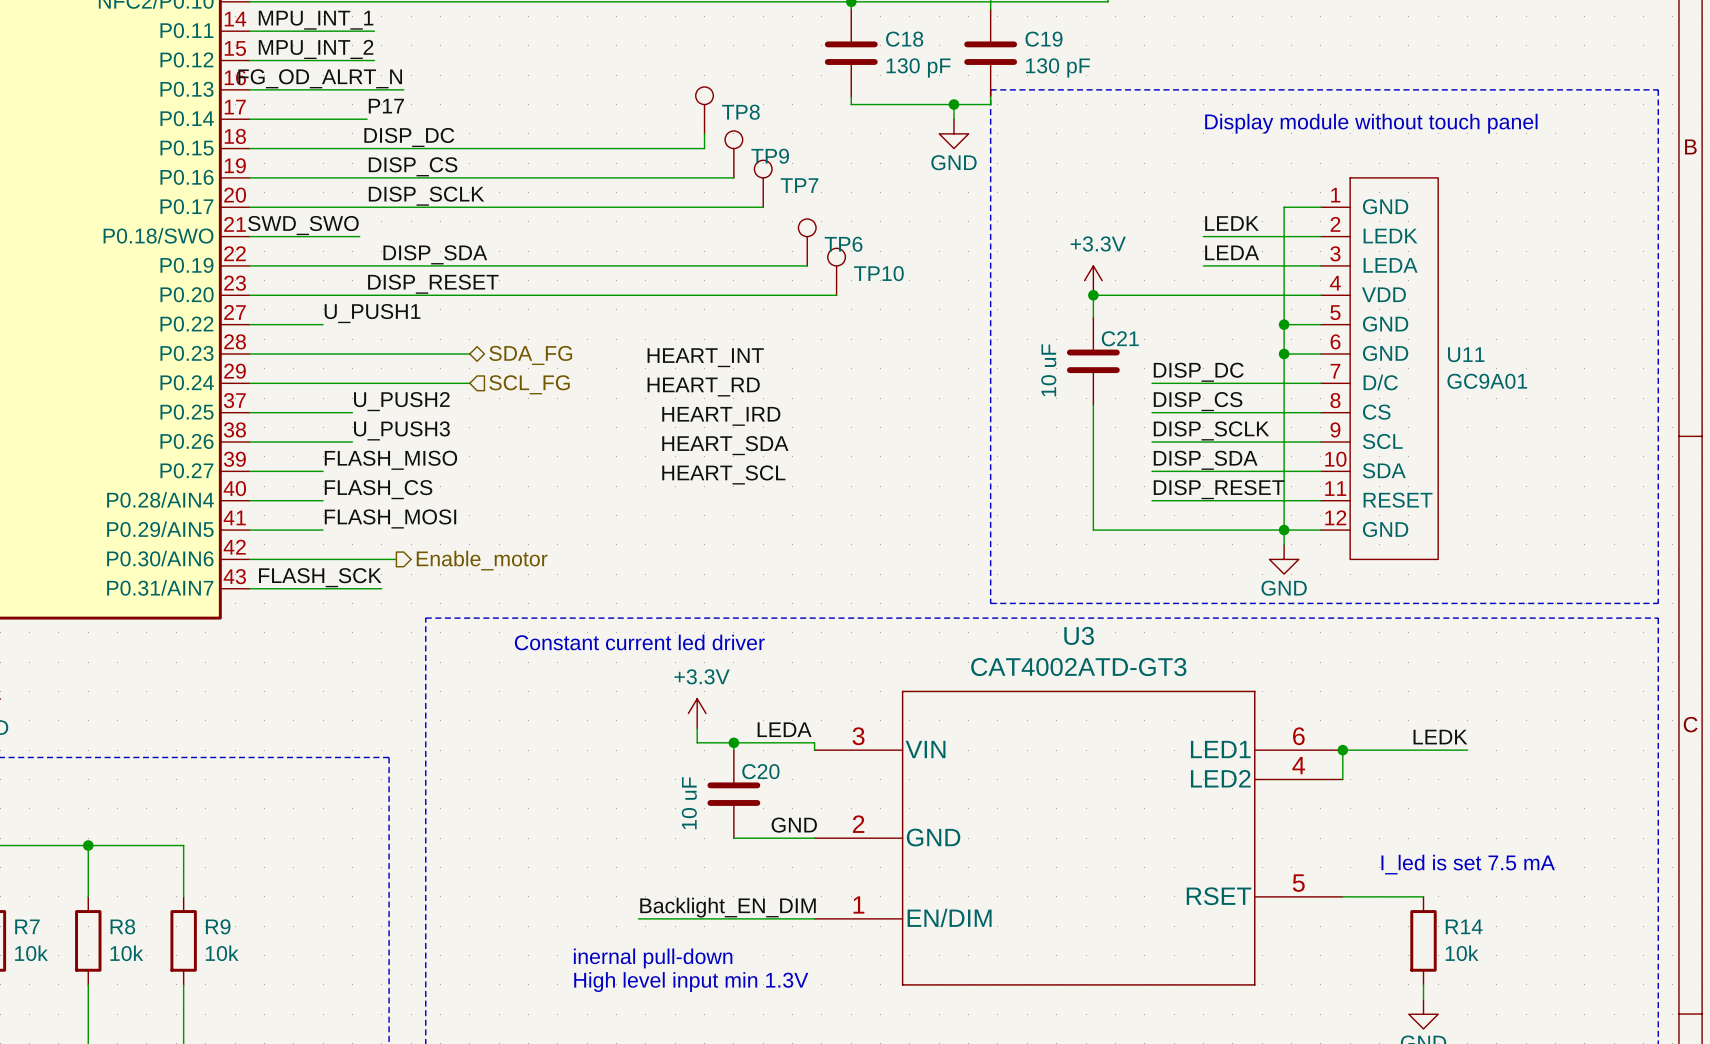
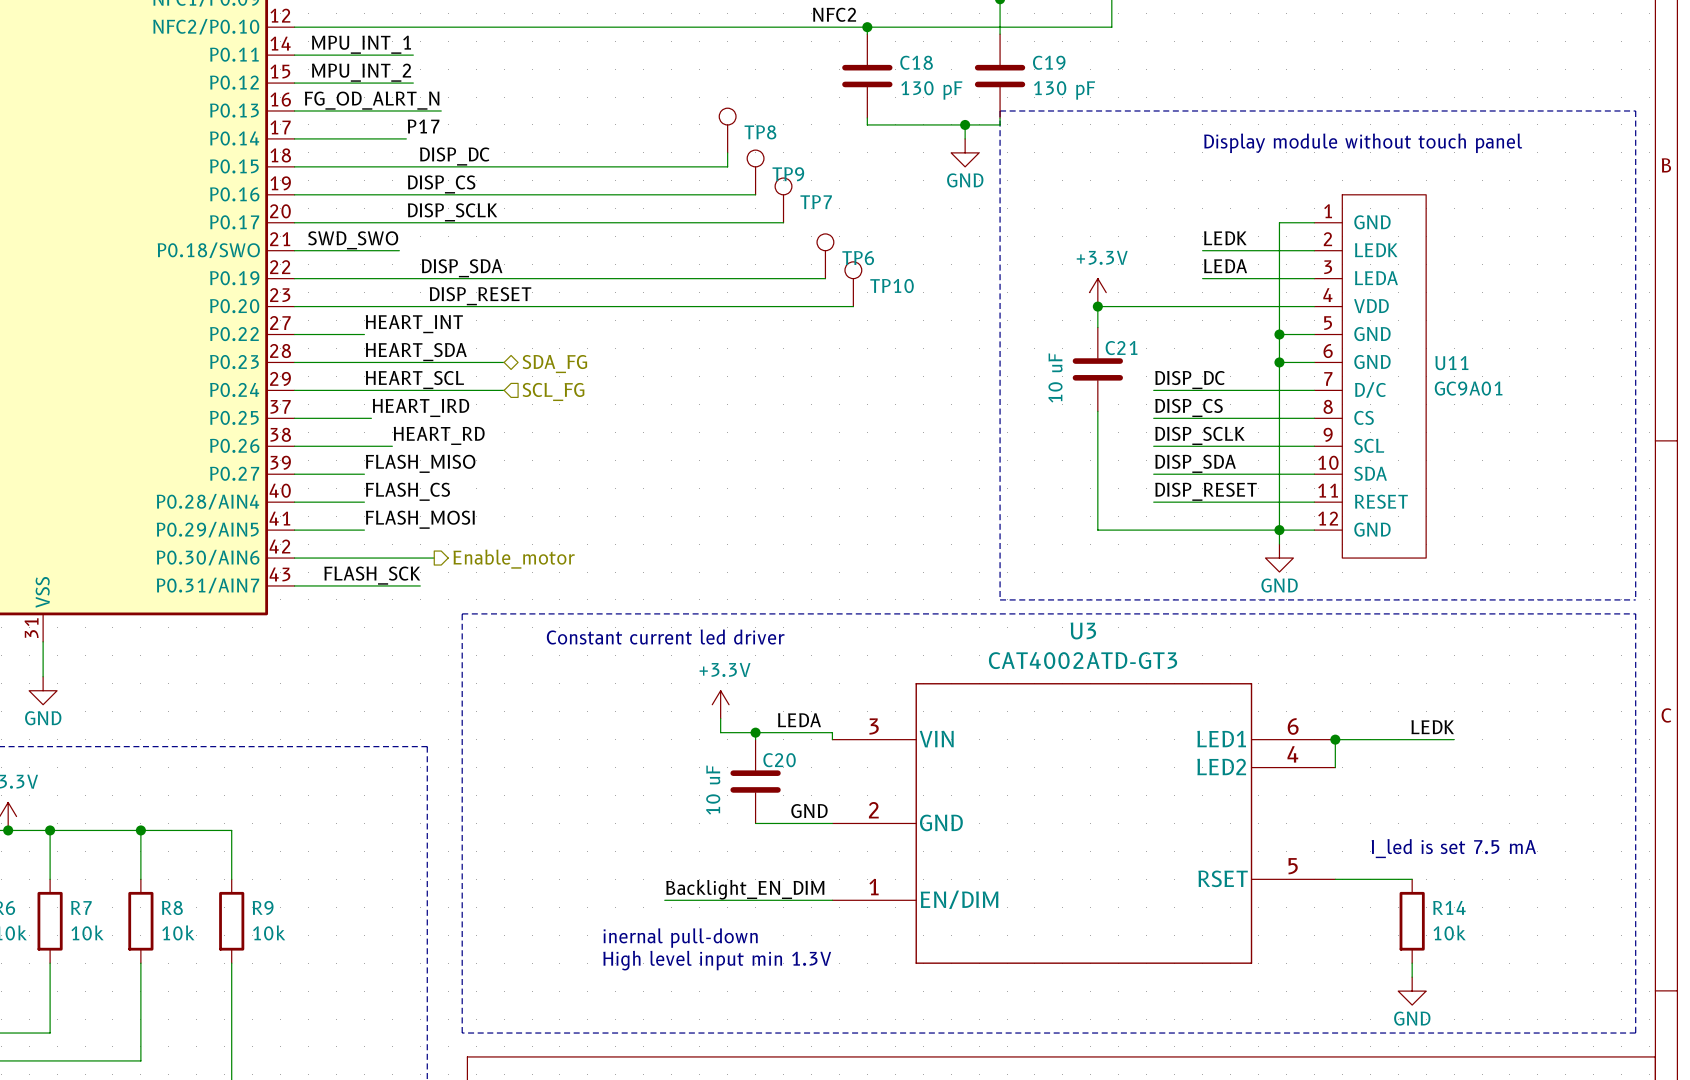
label: U_PUSH1 (372, 313) -> HEART_INT (414, 324)
label: none -> HEART_SDA (416, 352)
label: HEART_INT (705, 357) -> none
label: none -> HEART_SCL (414, 380)
label: HEART_RD (703, 387) -> none
label: none -> HEART_IRD (420, 407)
label: U_PUSH2 (401, 401) -> none
wire: (330, 412) (352, 412) -> none
label: HEART_IRD (721, 416) -> none
label: U_PUSH3 (401, 430) -> HEART_RD (439, 435)
label: HEART_SDA (725, 445) -> none
label: HEART_SCL (723, 474) -> none

